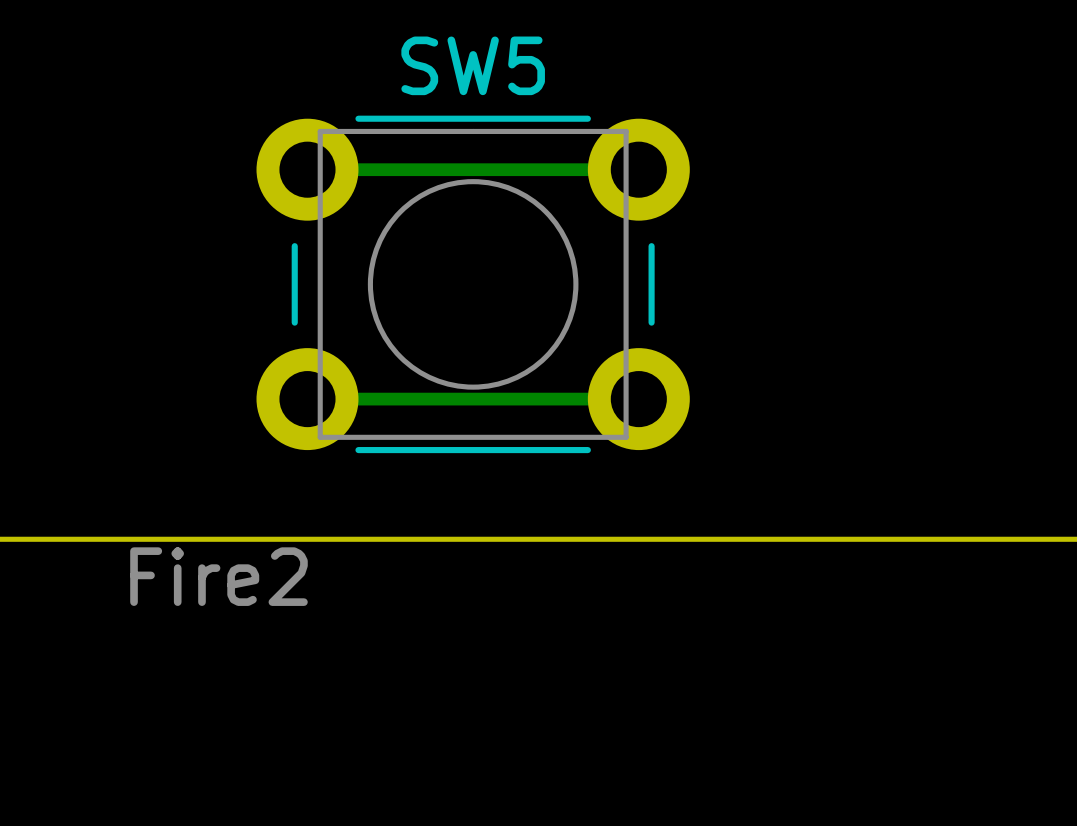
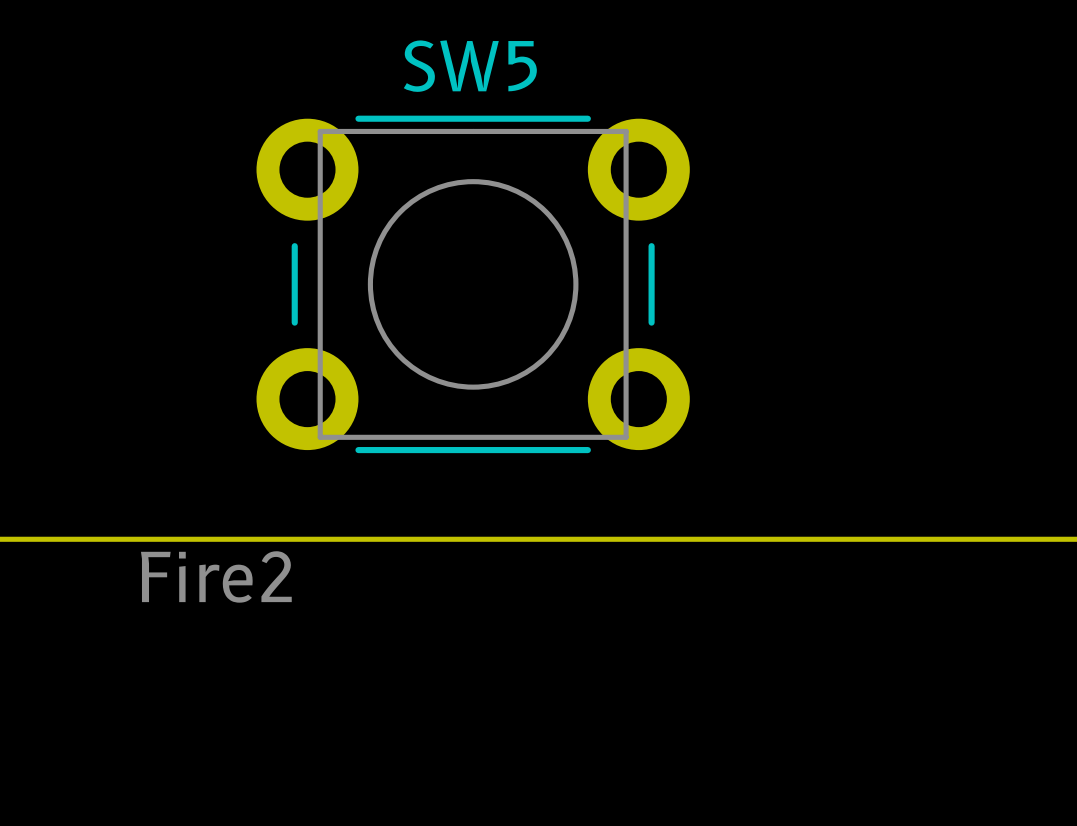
bottom track: (307, 169) (638, 169) -> none
bottom track: (307, 399) (638, 399) -> none

